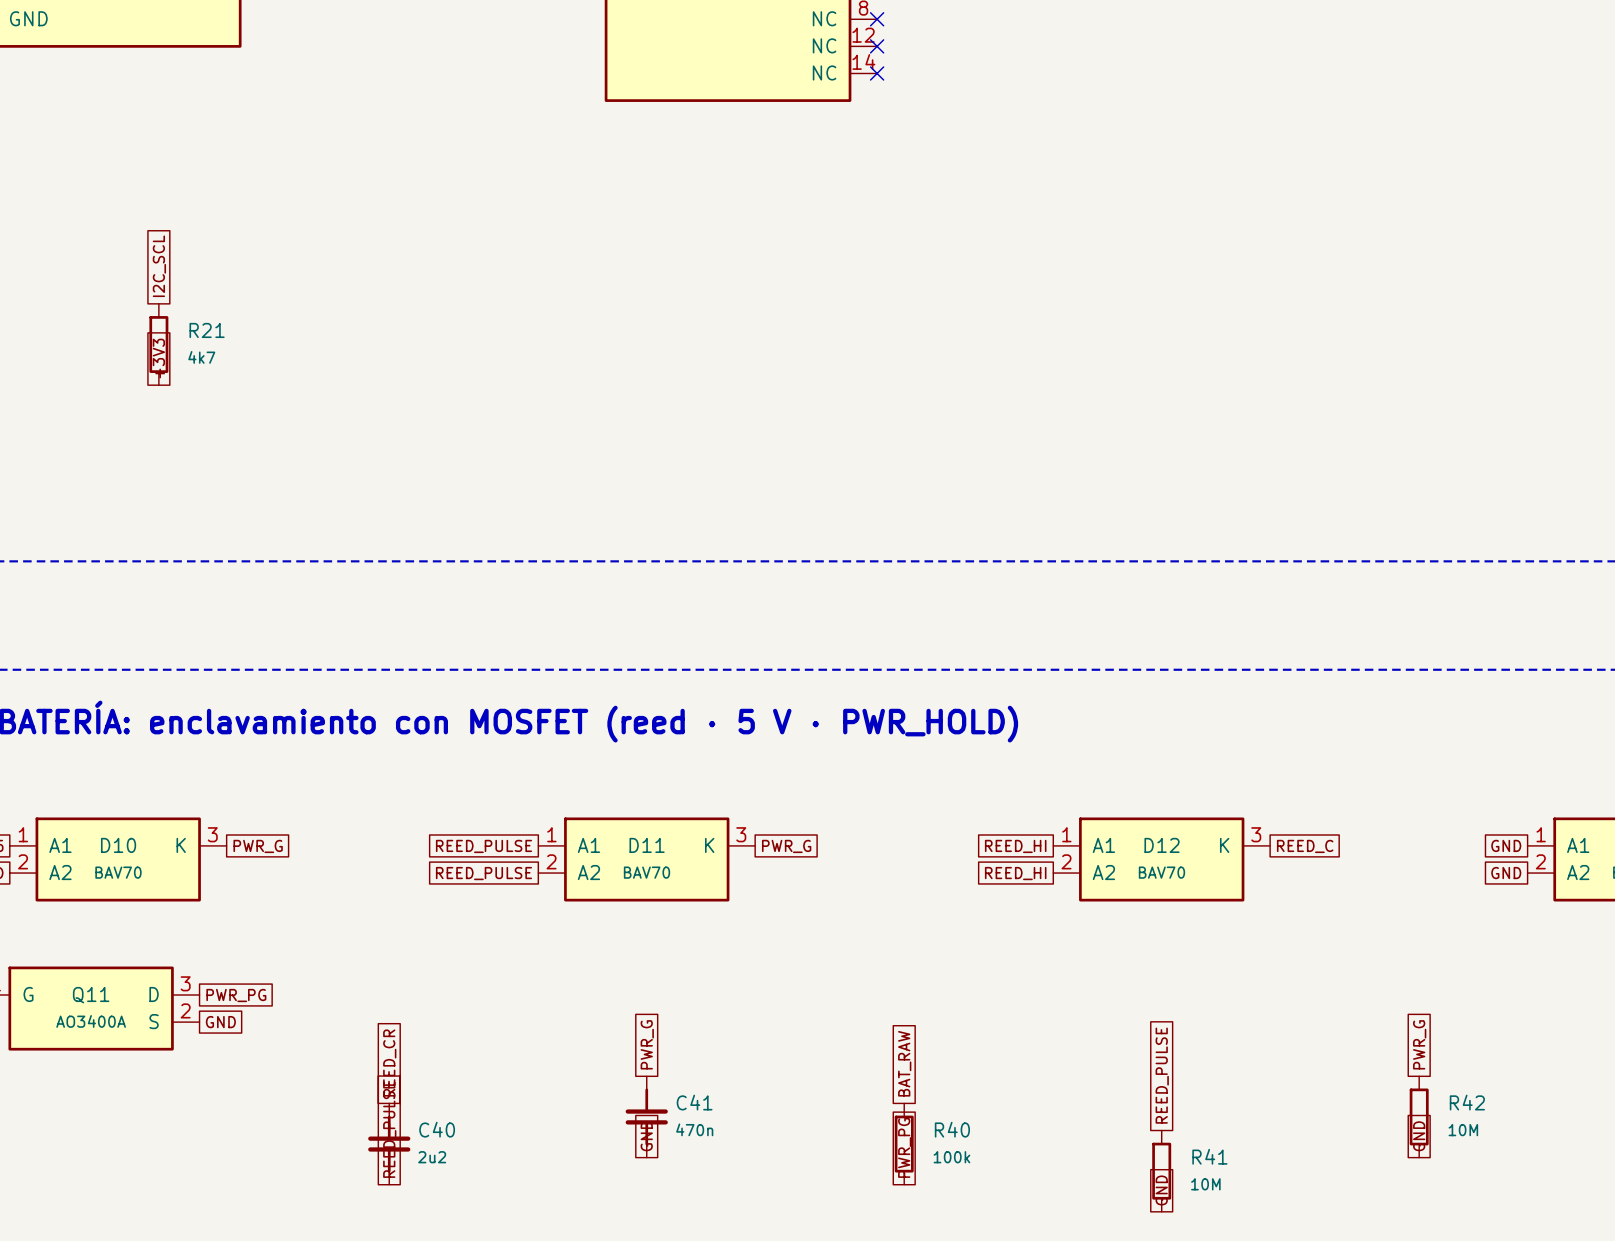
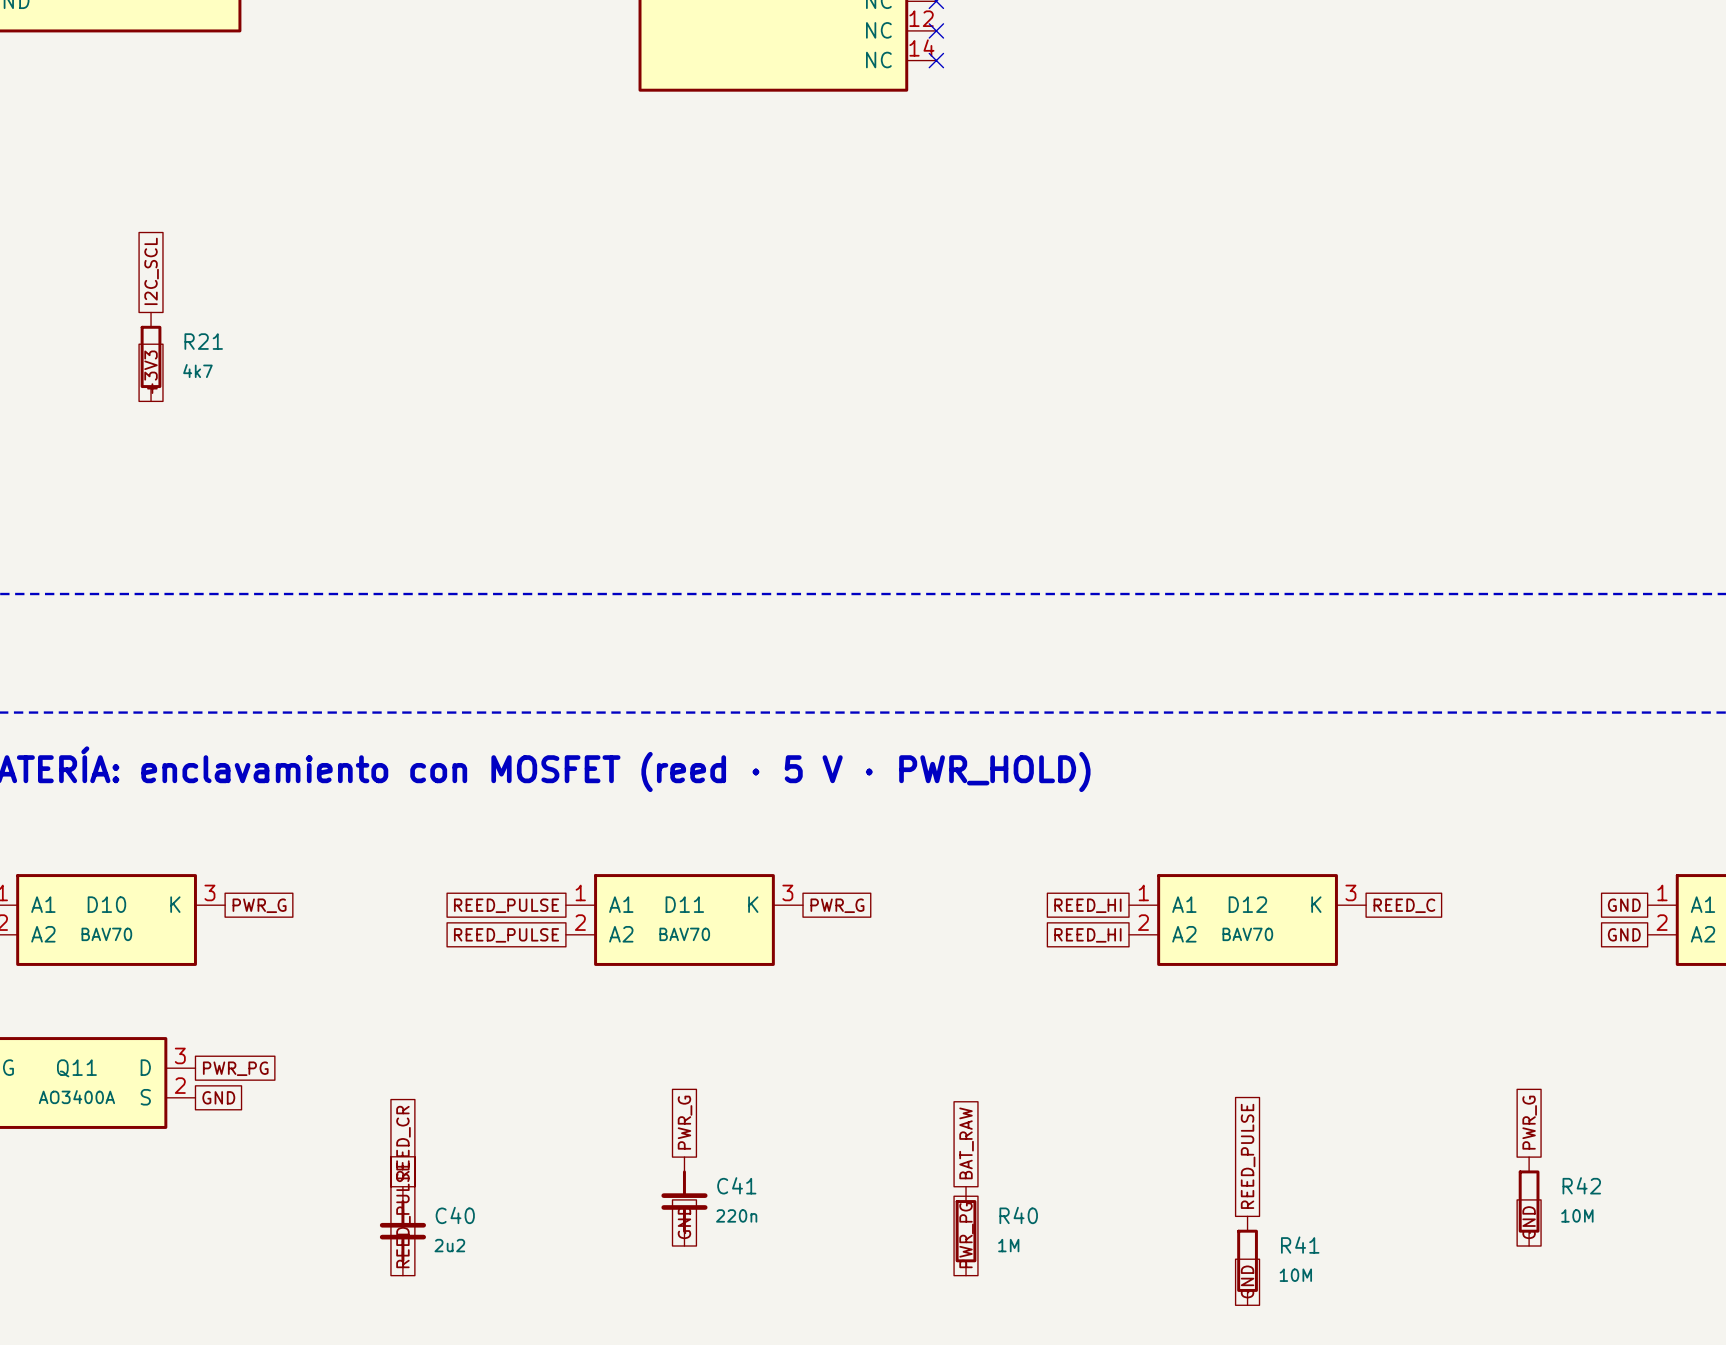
C41 value: 470n (694, 1129) -> 220n (736, 1215)
R40 value: 100k (951, 1157) -> 1M (1008, 1245)

